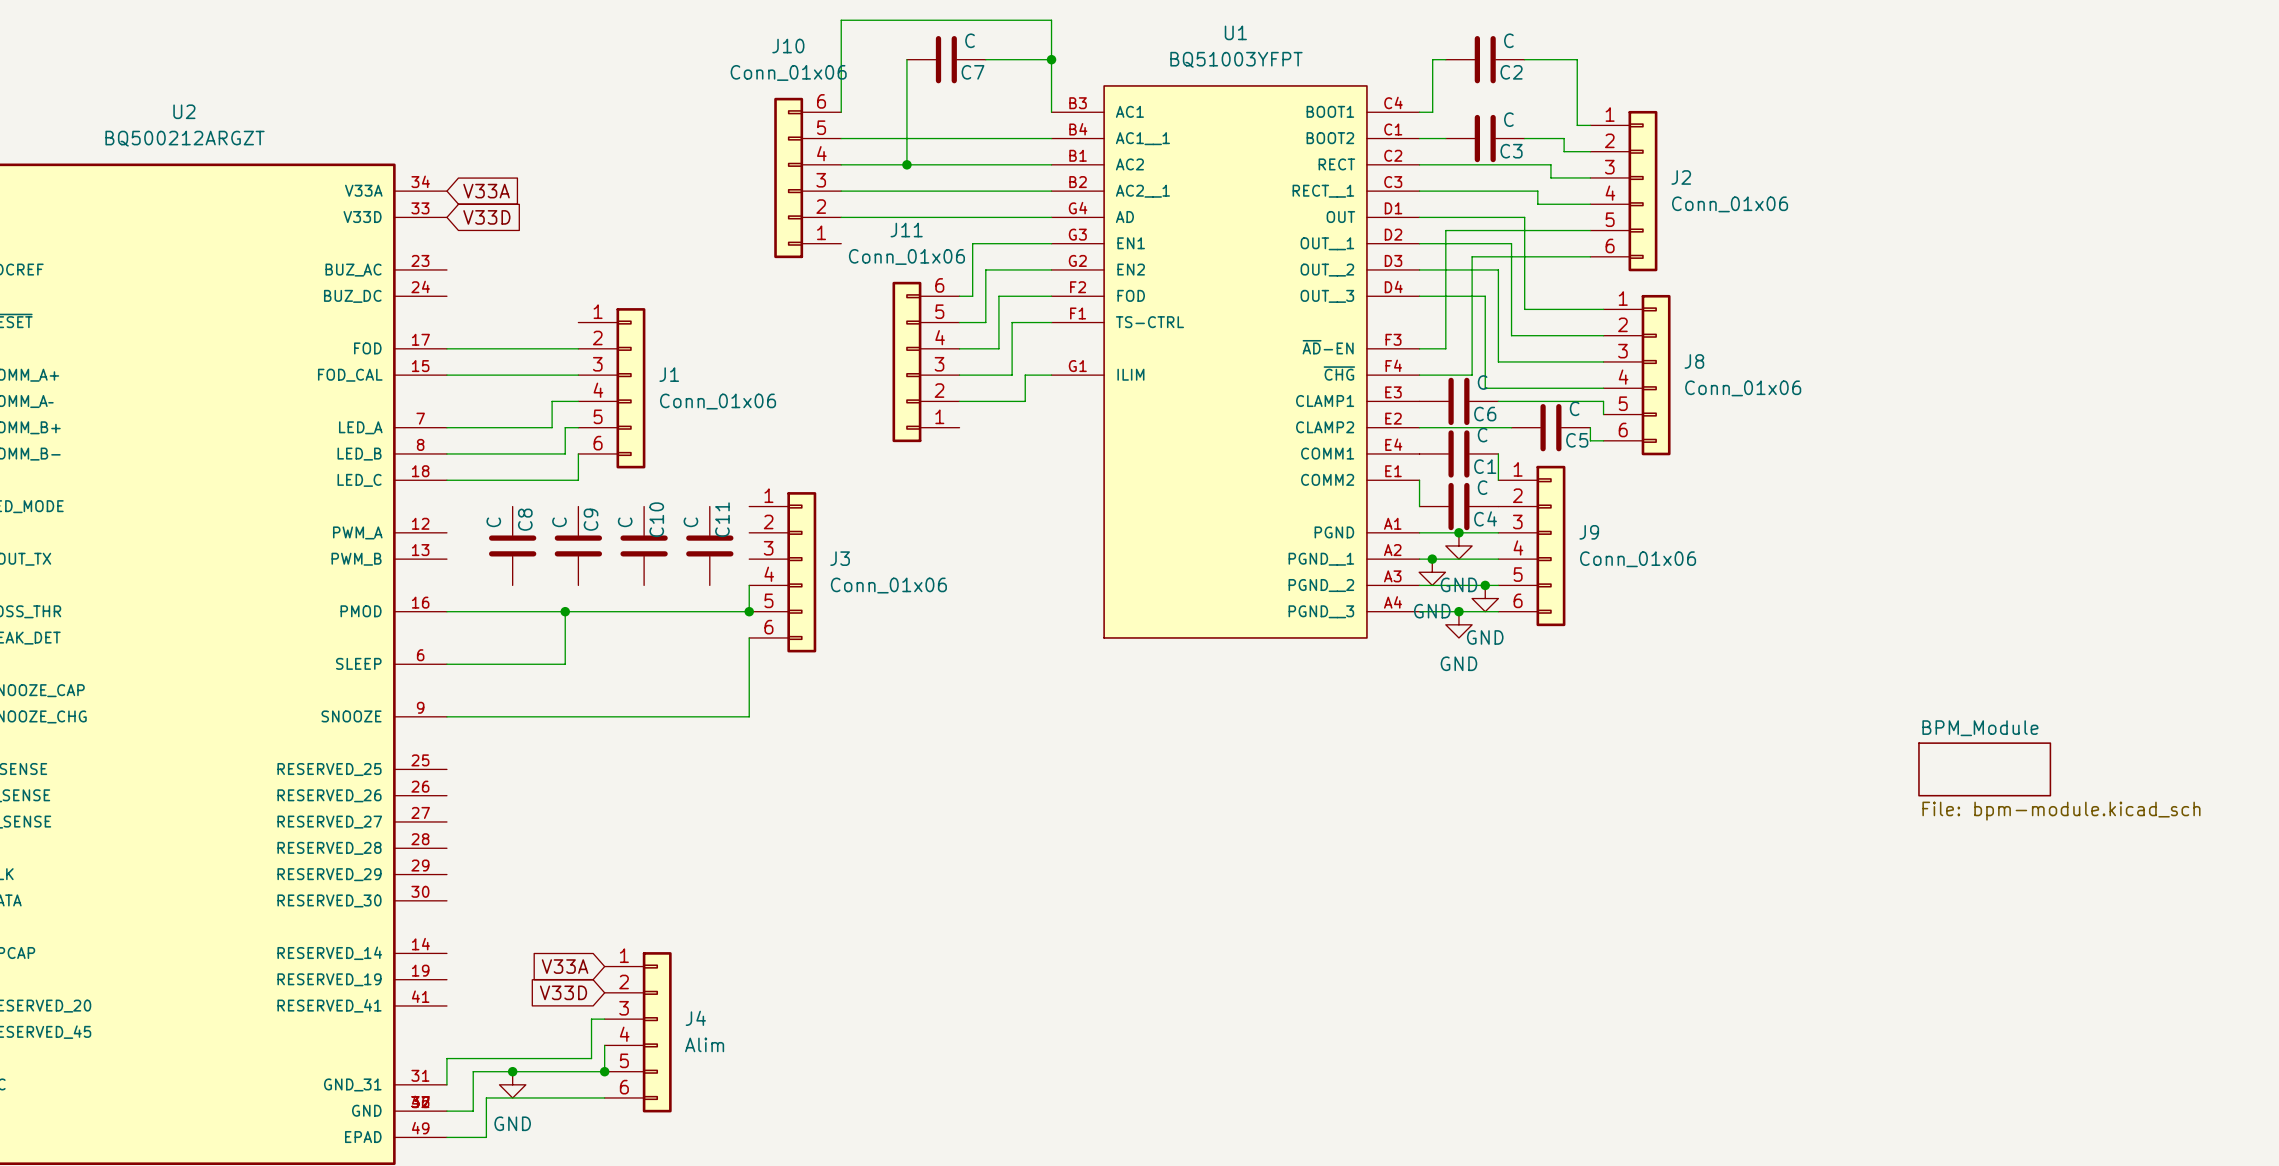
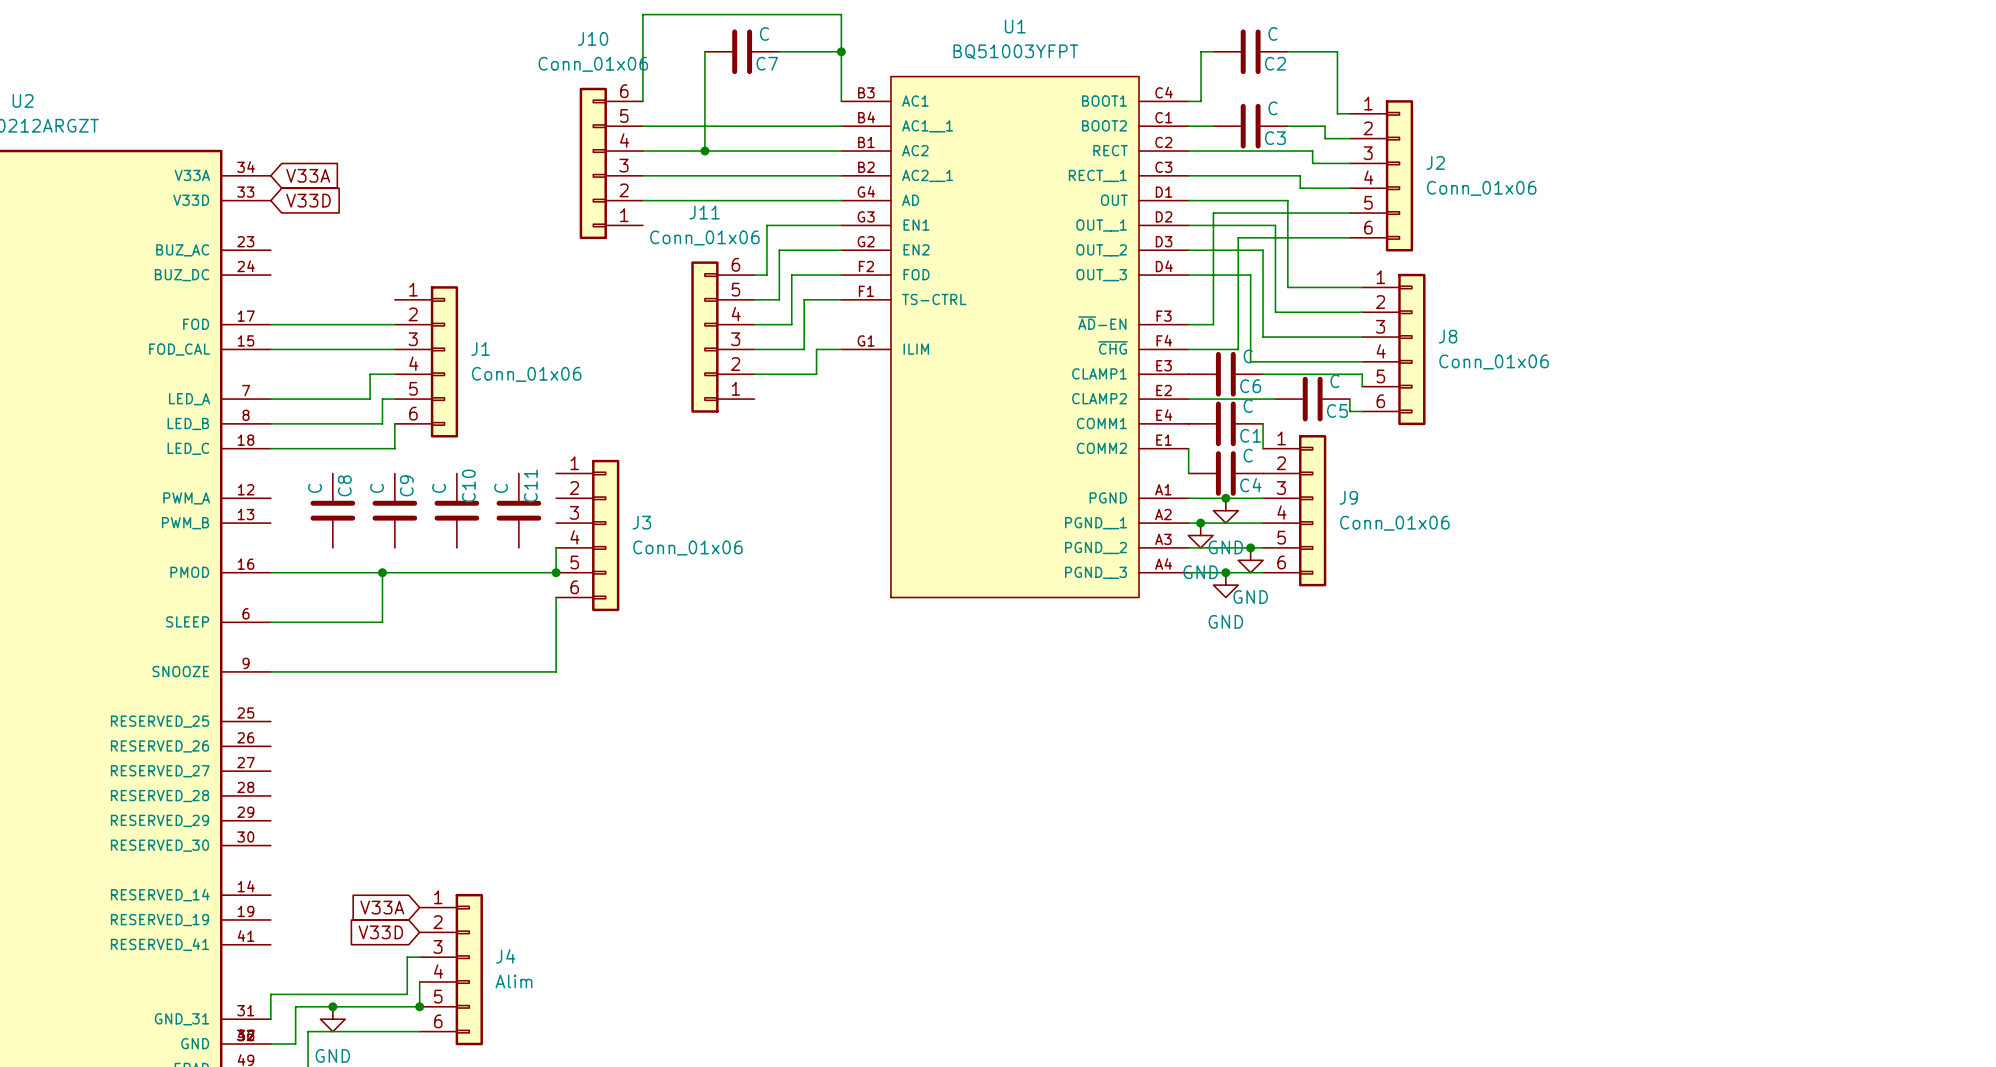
sheet BPM_Module: File: bpm-module.kicad_sch (1984, 769) -> none

